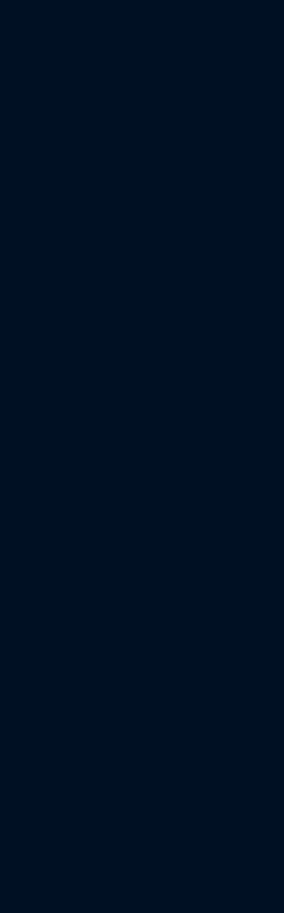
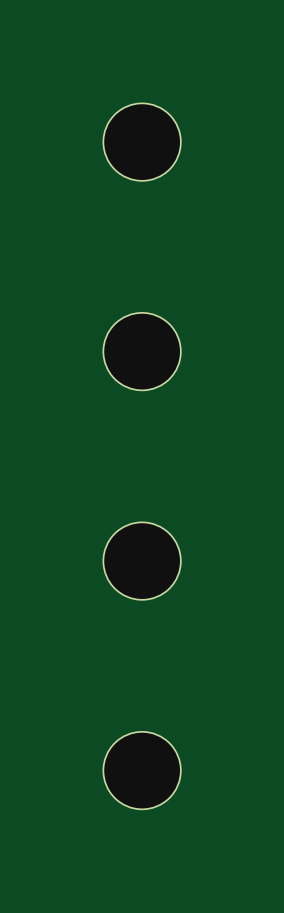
part: none -> (142, 142)
part: none -> (142, 351)
part: none -> (142, 561)
part: none -> (142, 770)

